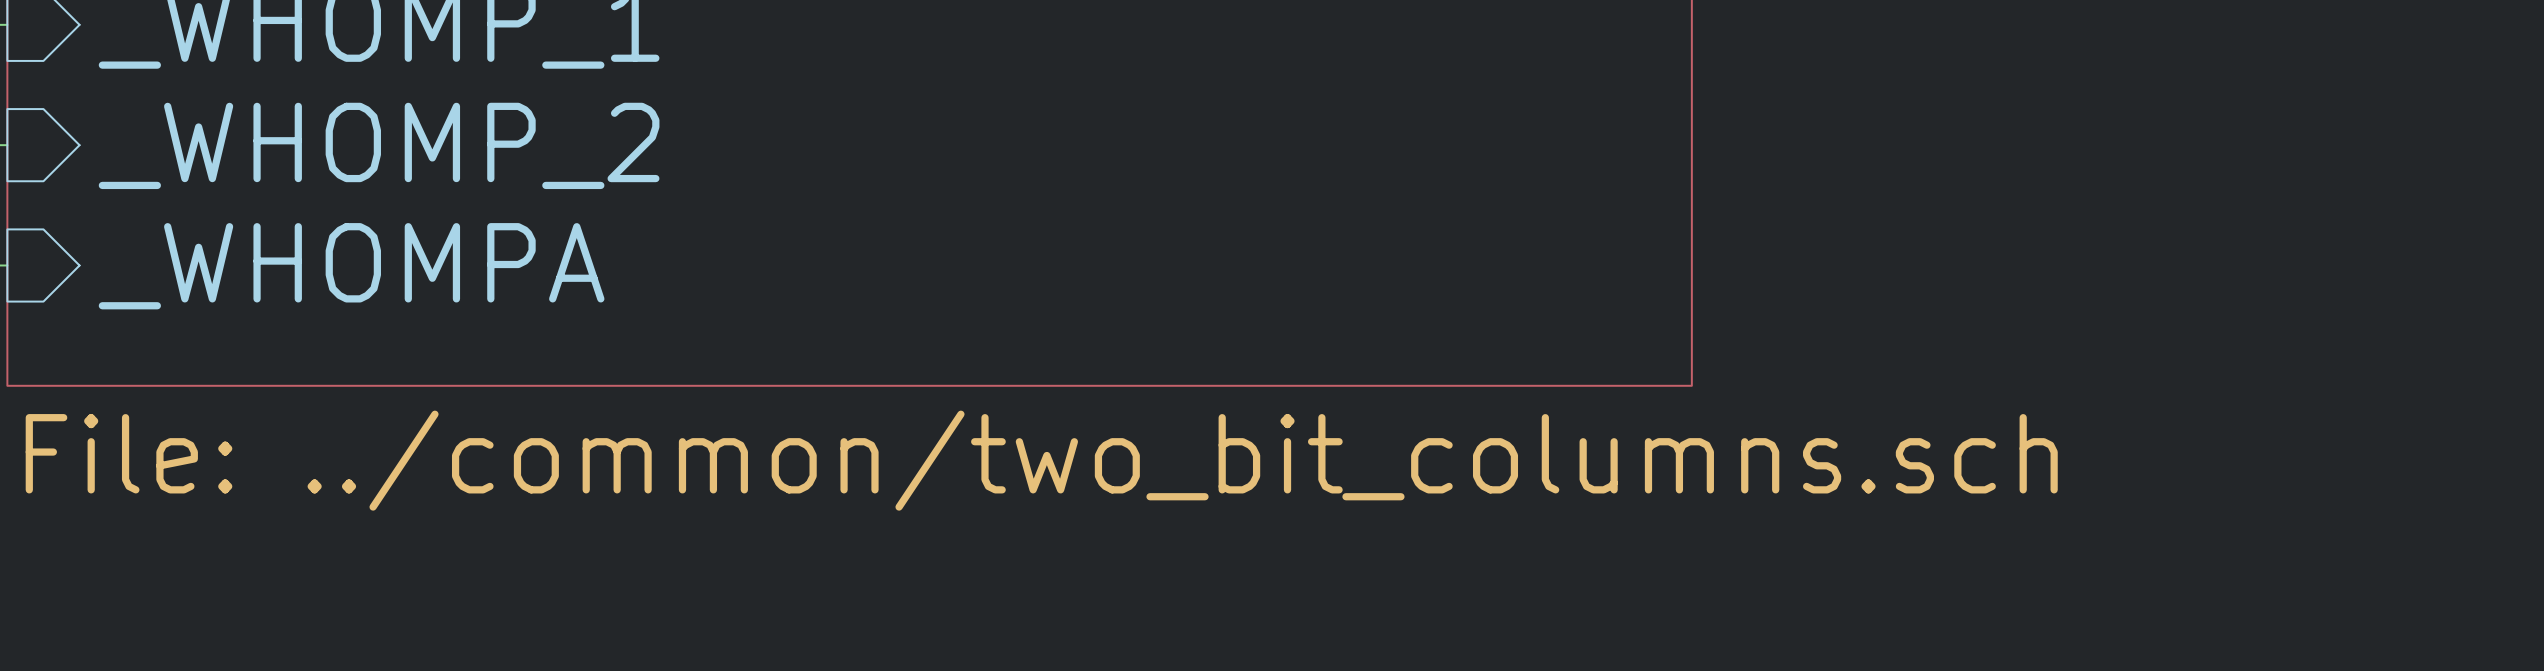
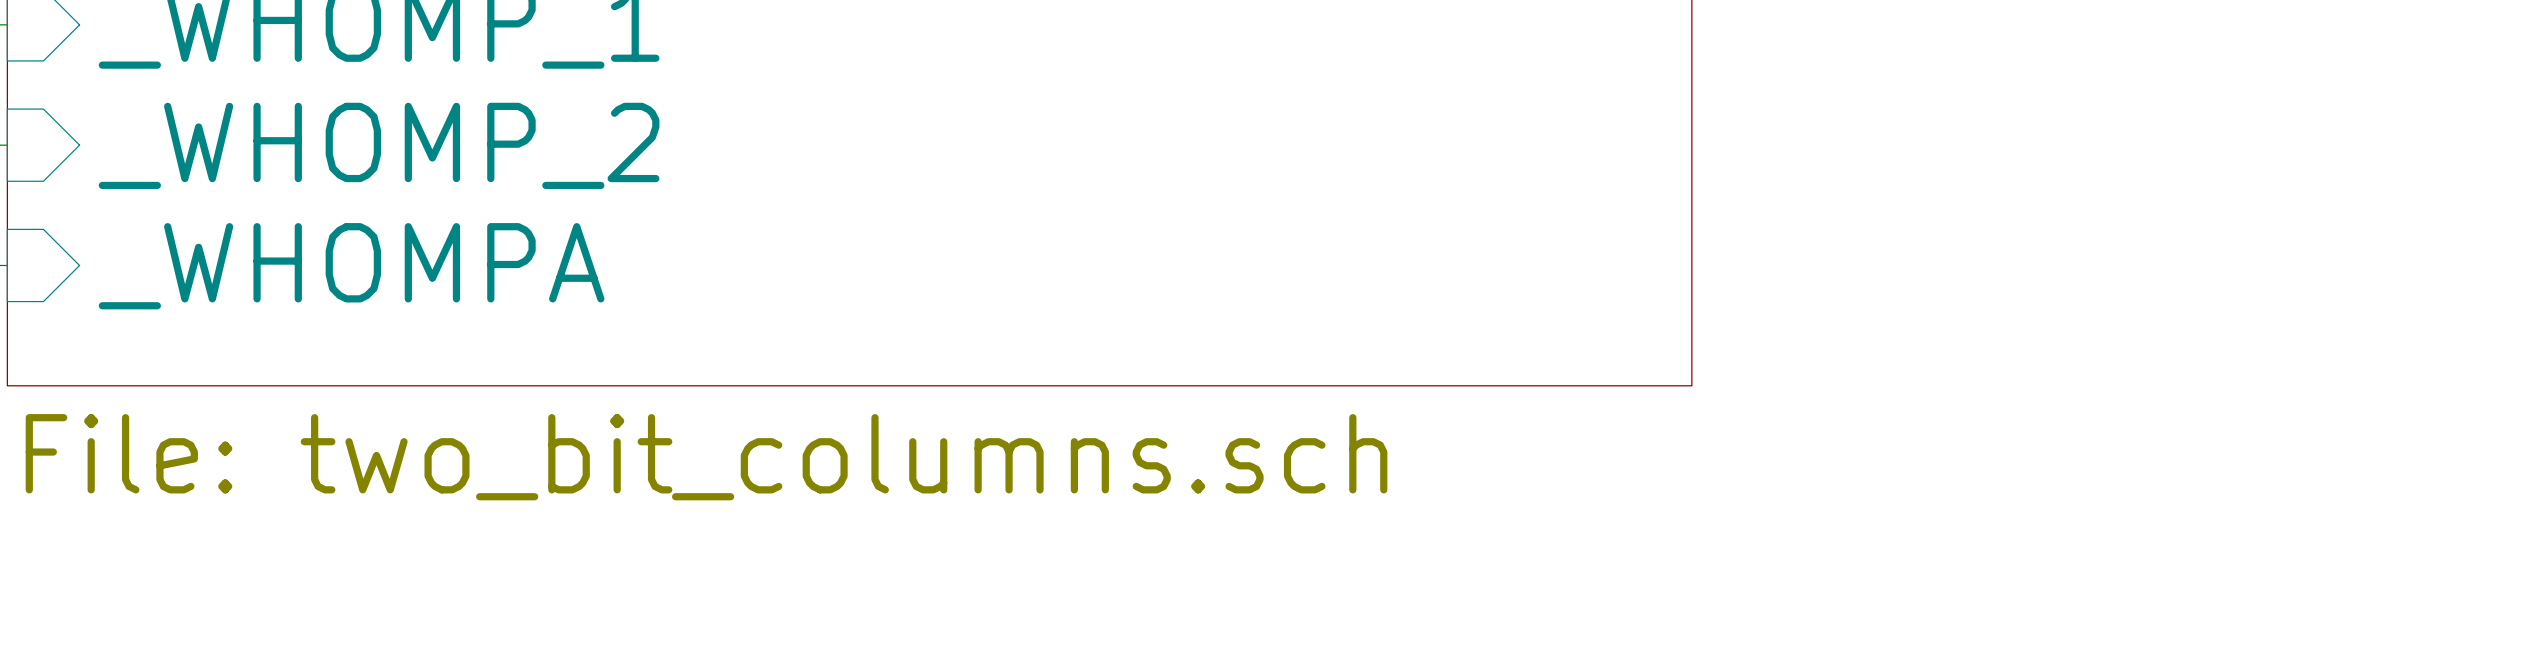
sheet value: File: ../common/two_bit_columns.sch (1041, 460) -> File: two_bit_columns.sch (706, 457)

